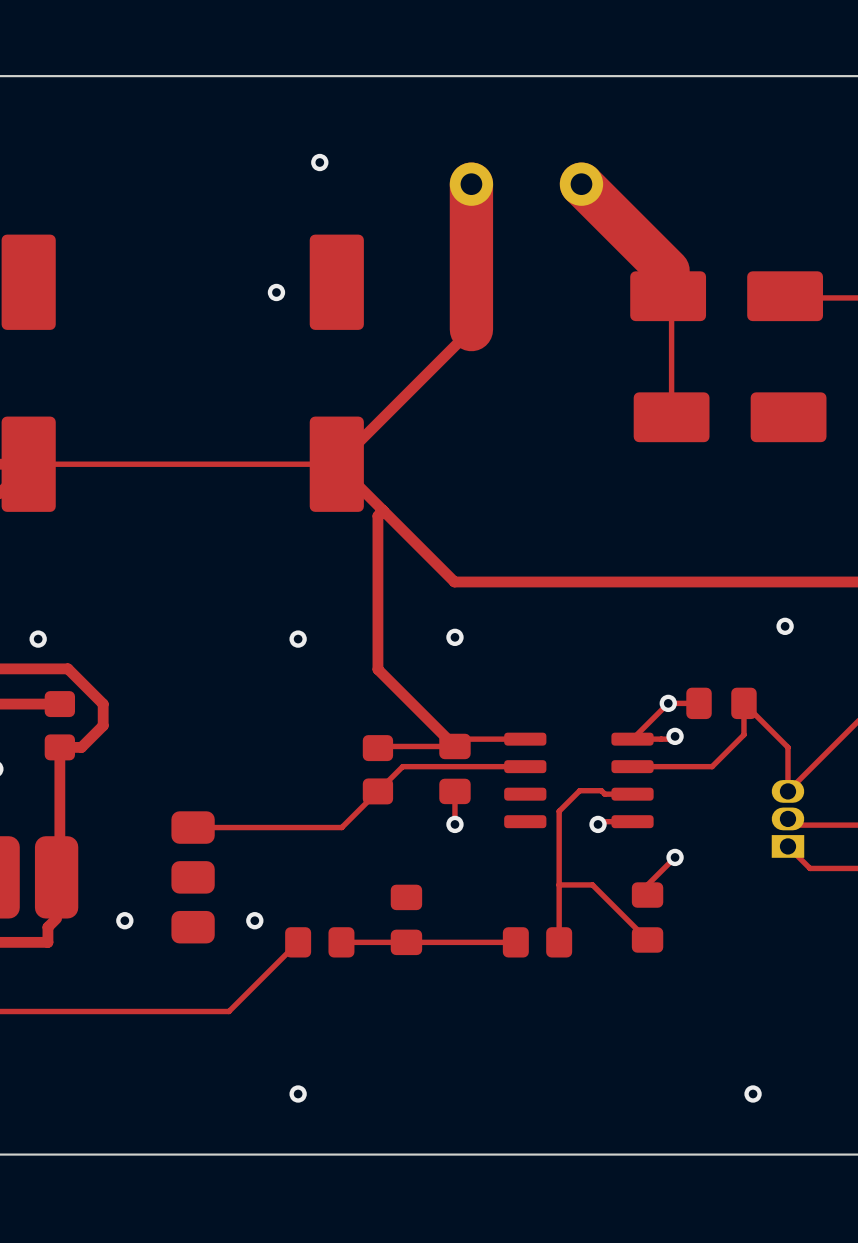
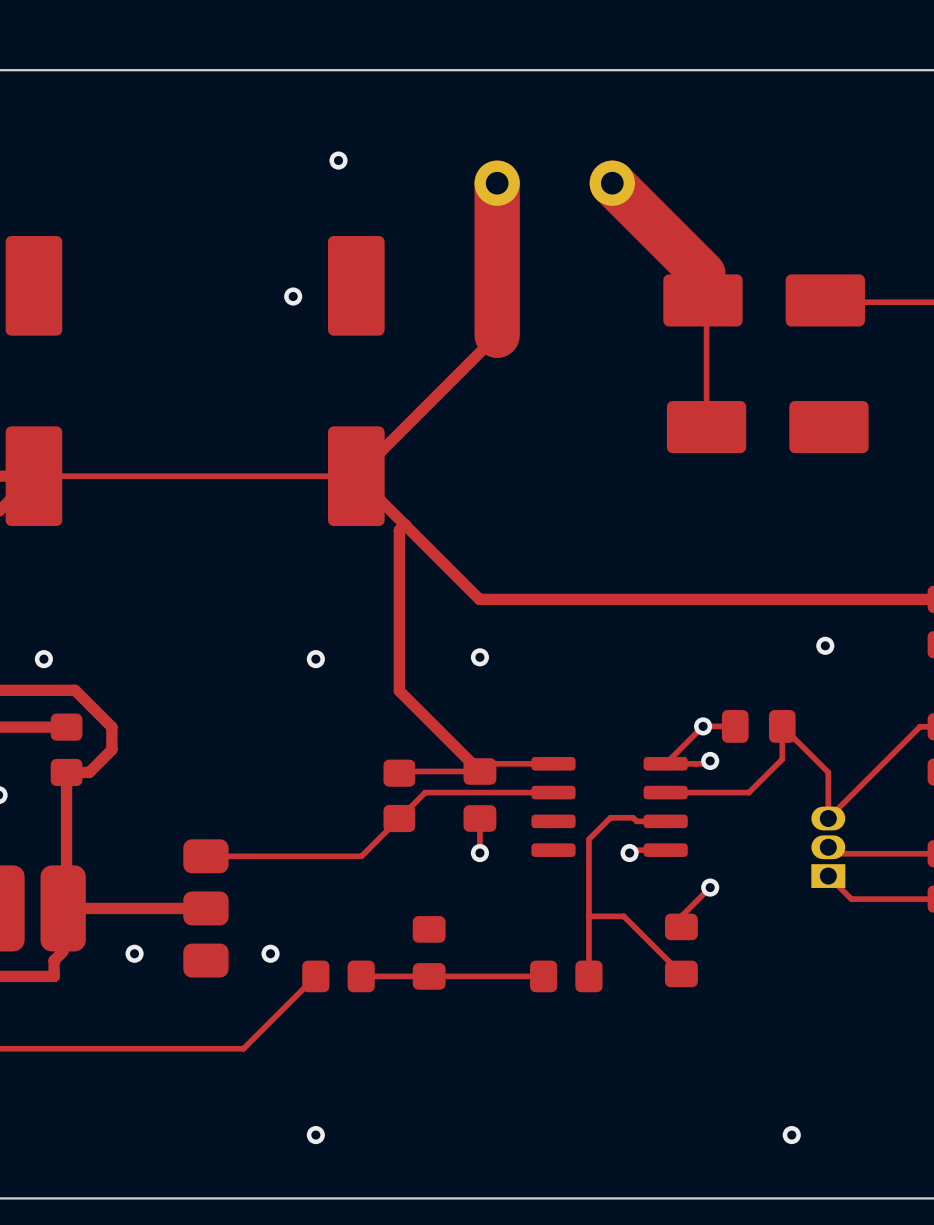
top track: none -> (205, 908) (63, 908)

